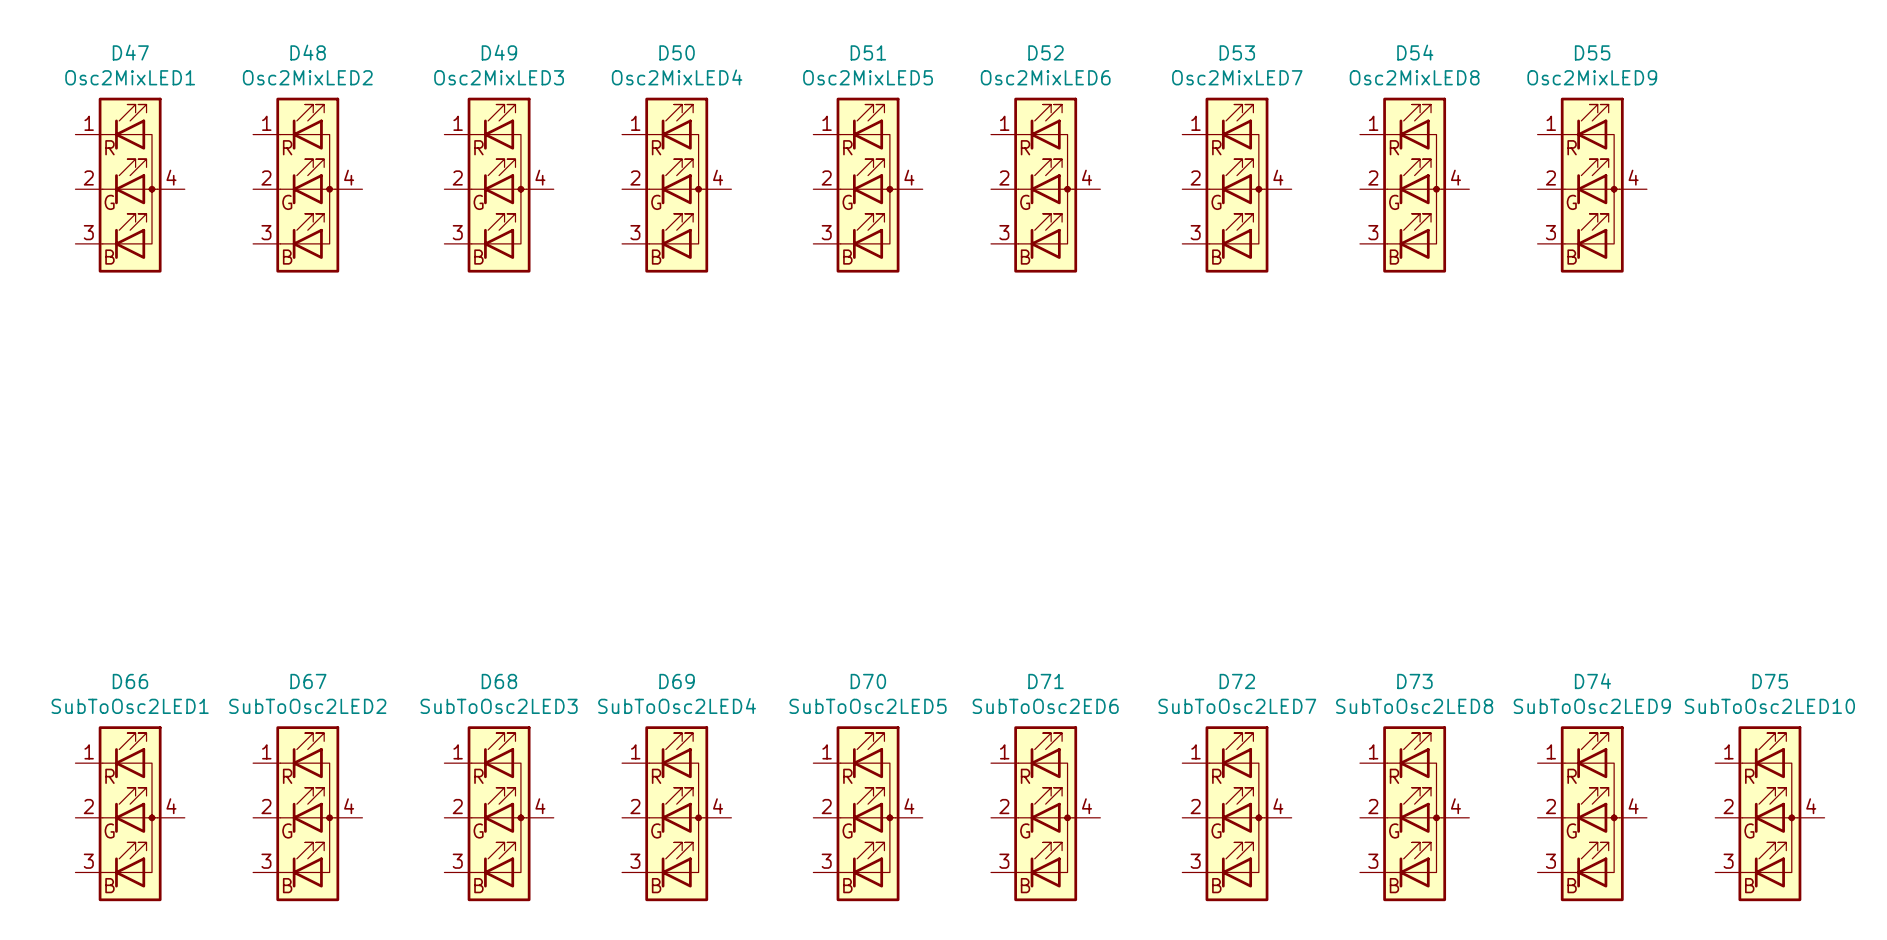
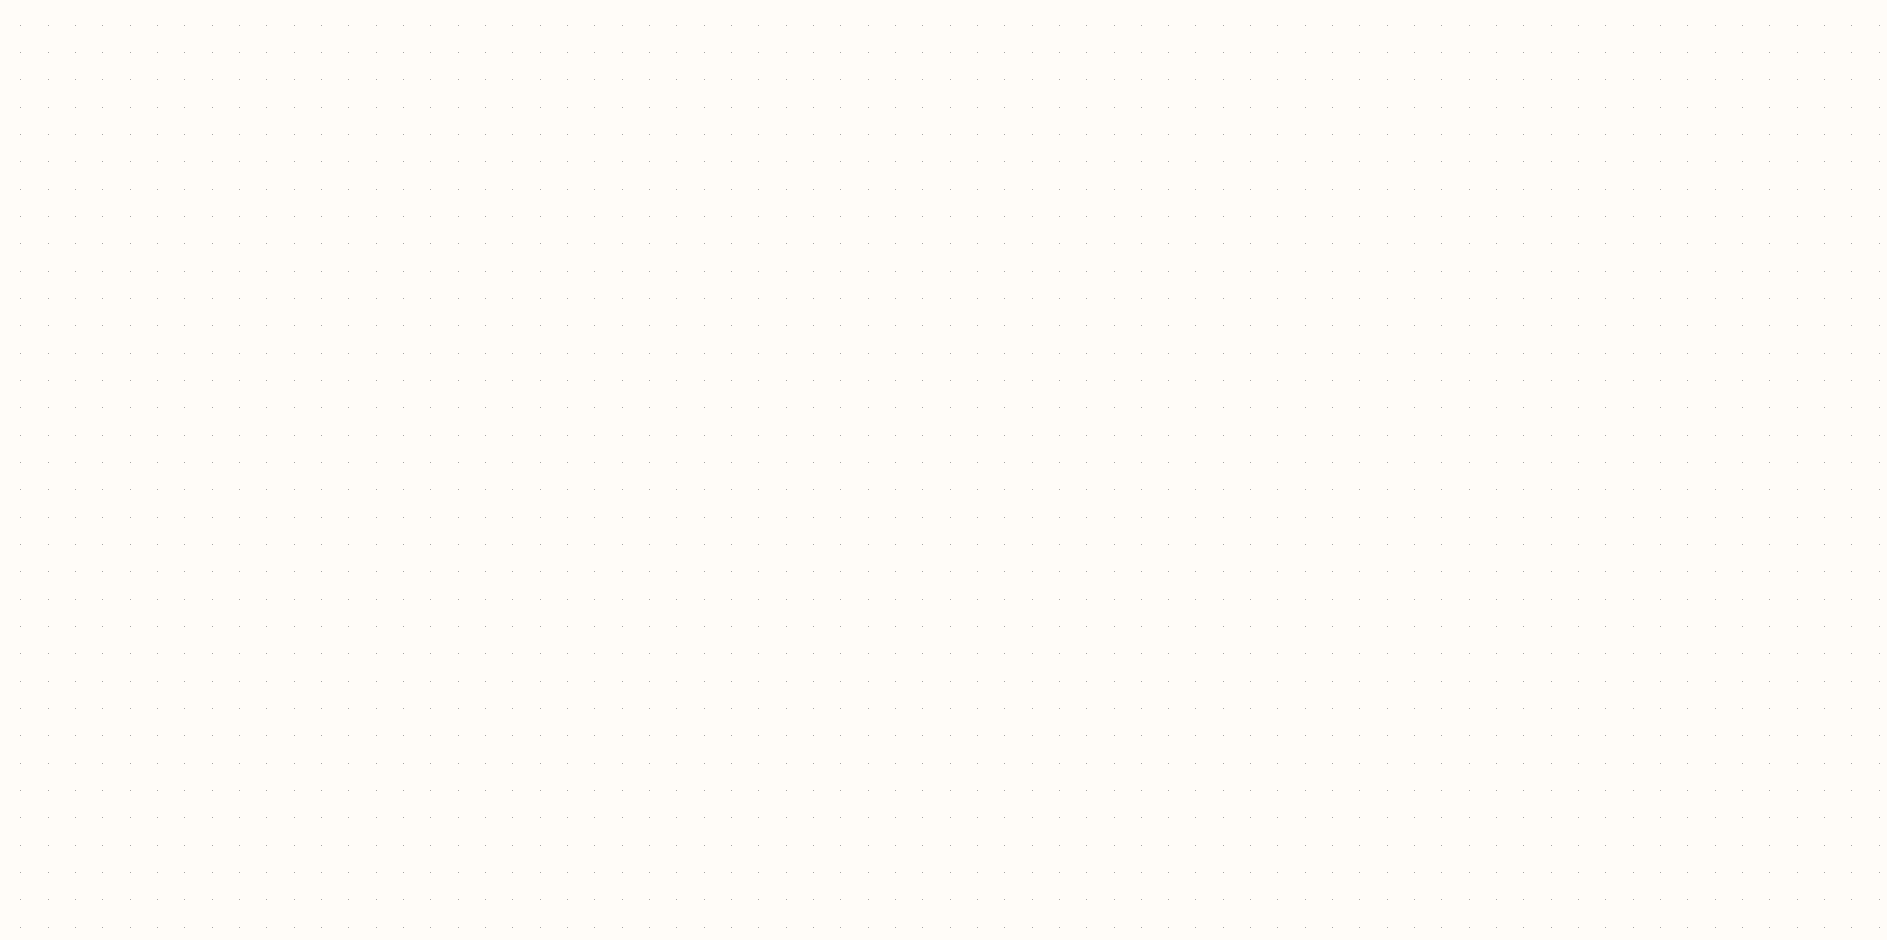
D47: Osc2MixLED1 (130, 185) -> none
D48: Osc2MixLED2 (307, 185) -> none
D49: Osc2MixLED3 (499, 185) -> none
D50: Osc2MixLED4 (676, 185) -> none
D51: Osc2MixLED5 (868, 185) -> none
D52: Osc2MixLED6 (1045, 185) -> none
D53: Osc2MixLED7 (1236, 185) -> none
D54: Osc2MixLED8 (1414, 185) -> none
D55: Osc2MixLED9 (1592, 185) -> none
D66: SubToOsc2LED1 (130, 813) -> none
D67: SubToOsc2LED2 (307, 813) -> none
D68: SubToOsc2LED3 (499, 813) -> none
D69: SubToOsc2LED4 (676, 813) -> none
D70: SubToOsc2LED5 (868, 813) -> none
D71: SubToOsc2ED6 (1045, 813) -> none
D72: SubToOsc2LED7 (1236, 813) -> none
D73: SubToOsc2LED8 (1414, 813) -> none
D74: SubToOsc2LED9 (1592, 813) -> none
D75: SubToOsc2LED10 (1769, 813) -> none

